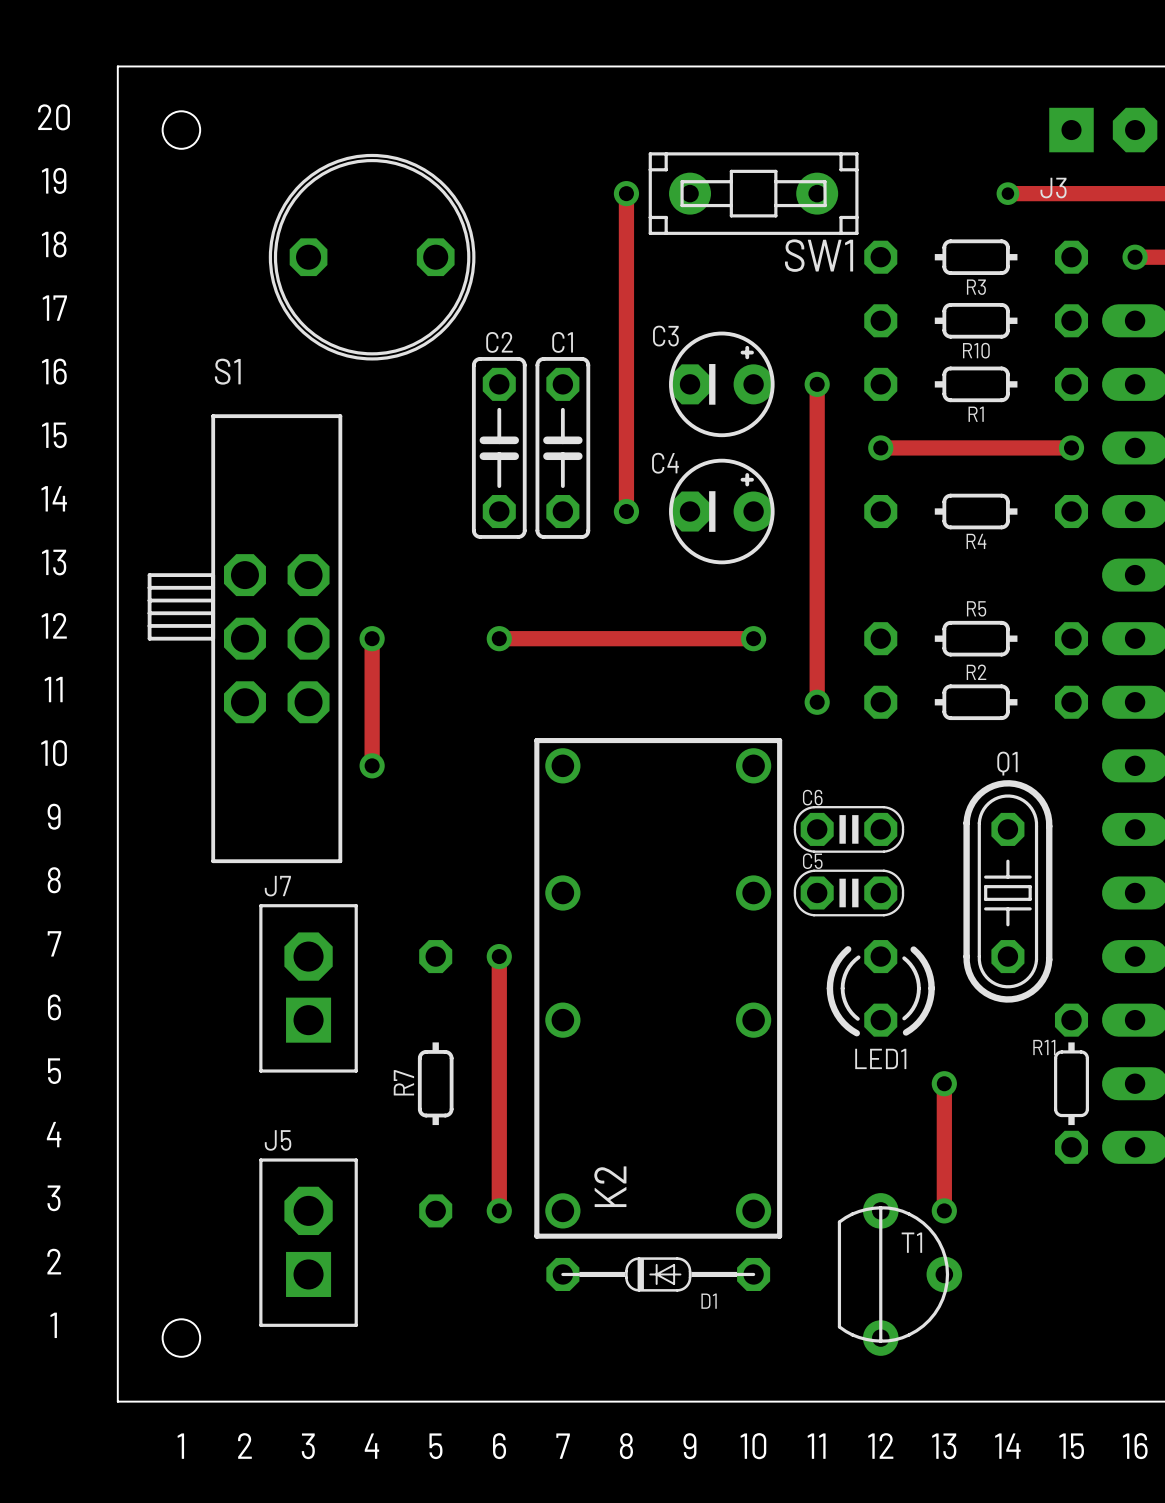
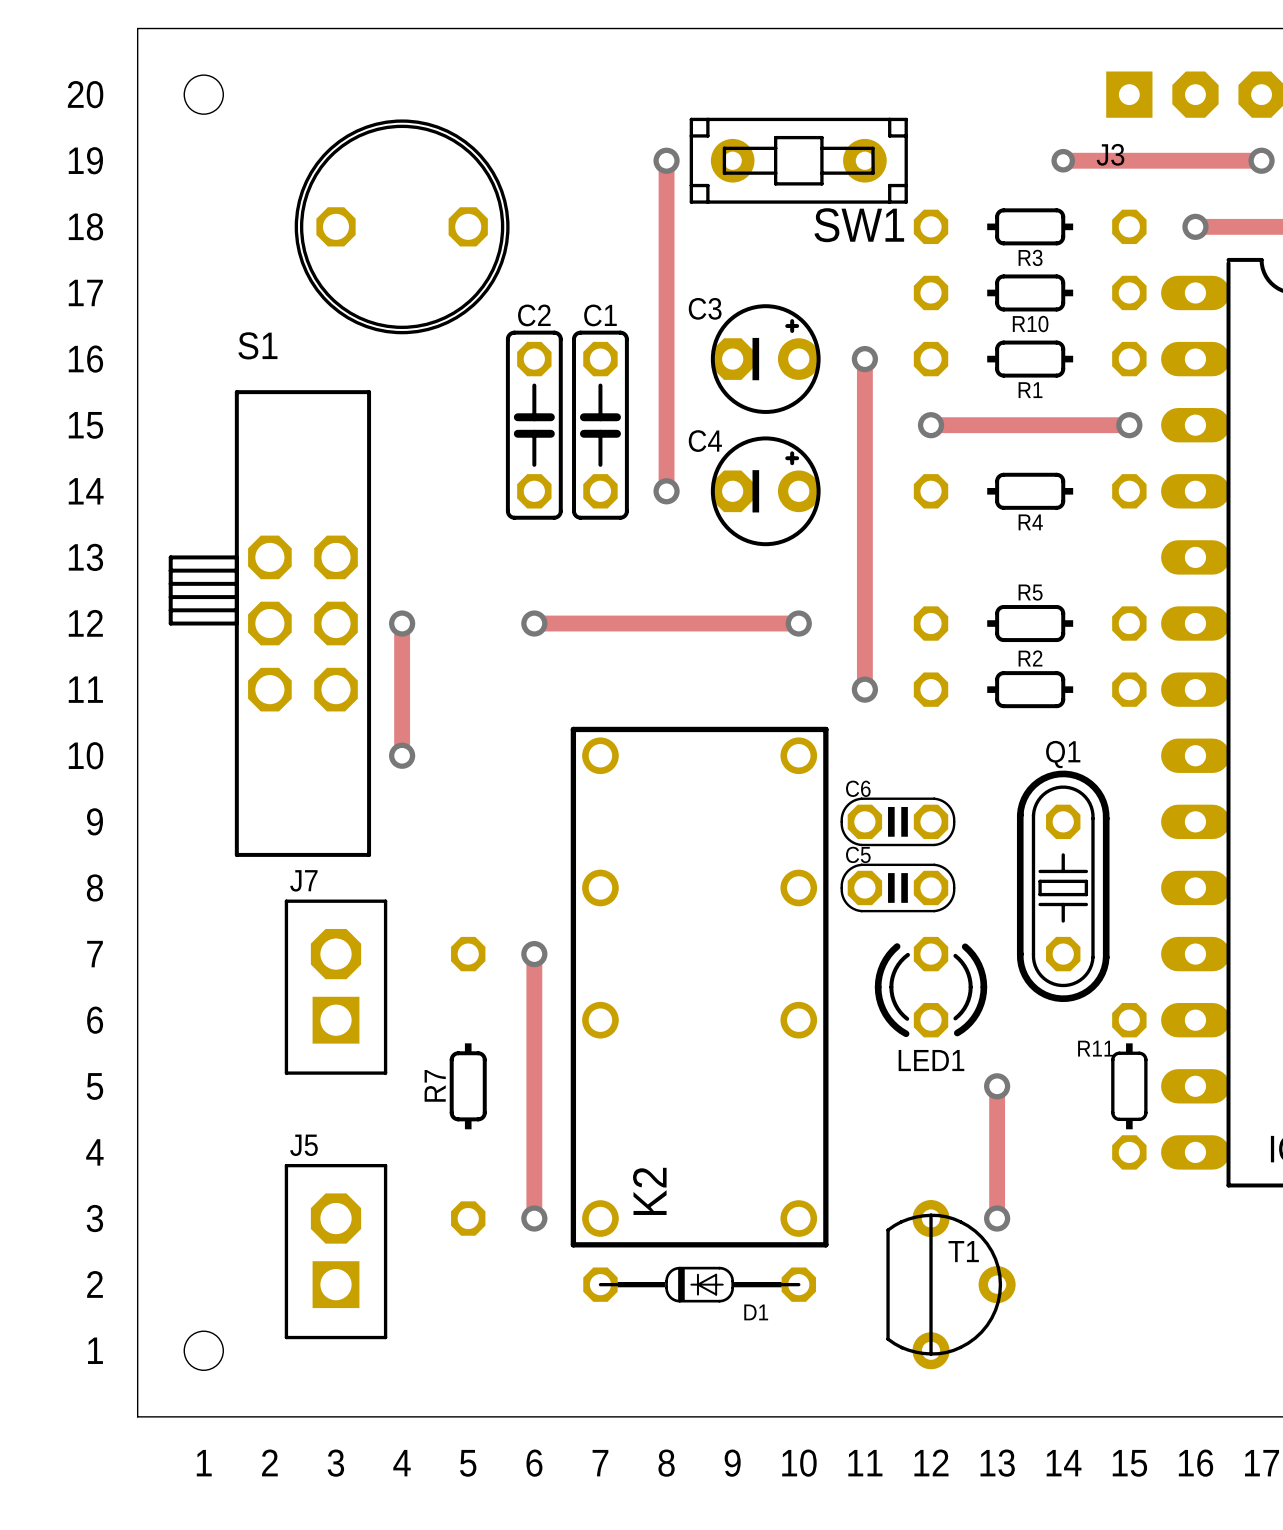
text position: 20 (54, 117) -> 20 (85, 94)
text position: 19 (54, 180) -> 19 (85, 160)
text position: 18 (54, 244) -> 18 (85, 226)
text position: 17 (54, 308) -> 17 (85, 292)
text position: 16 (54, 371) -> 16 (85, 359)
text position: 15 (54, 435) -> 15 (85, 425)
text position: 14 (54, 498) -> 14 (86, 491)
text position: 13 (54, 562) -> 13 (85, 557)
text position: 12 (54, 625) -> 12 (85, 623)
text position: 11 (53, 689) -> 11 (85, 689)
text position: 10 (54, 753) -> 10 (86, 755)
text position: 9 (54, 816) -> 9 (94, 821)
text position: 8 (54, 880) -> 8 (94, 887)
text position: 7 (54, 943) -> 7 (95, 954)
text position: 6 (54, 1007) -> 6 (95, 1020)
text position: 5 (54, 1071) -> 5 (94, 1086)
text position: 4 (54, 1134) -> 4 (94, 1152)
text position: 3 (53, 1198) -> 3 (94, 1218)
text position: 2 (54, 1261) -> 2 (94, 1284)
text position: 1 (53, 1325) -> 1 (95, 1350)

